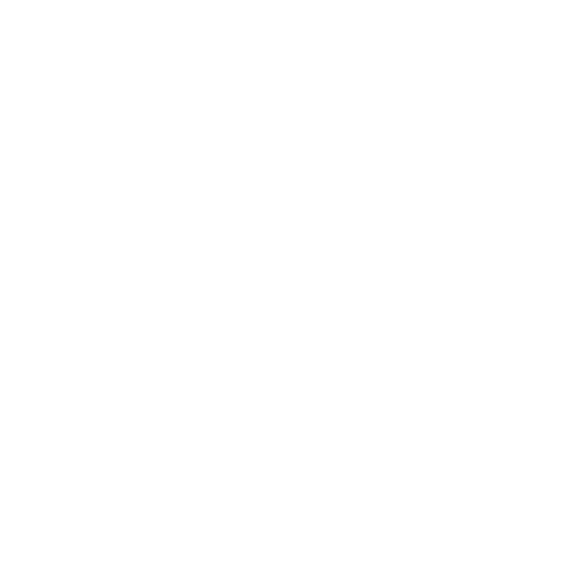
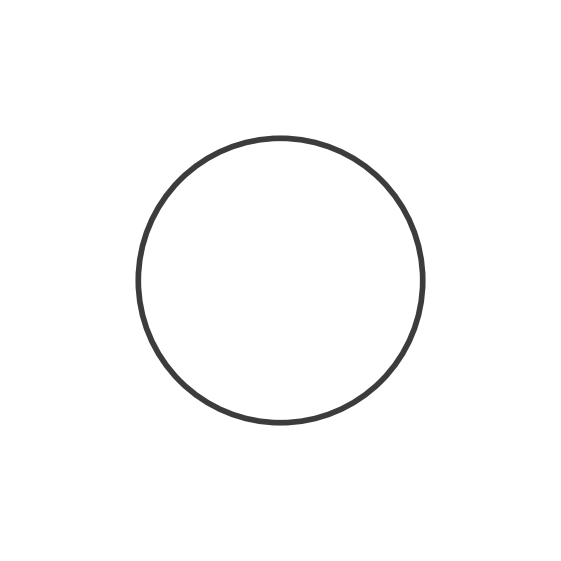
drawing: none -> [135, 135, 426, 426]

